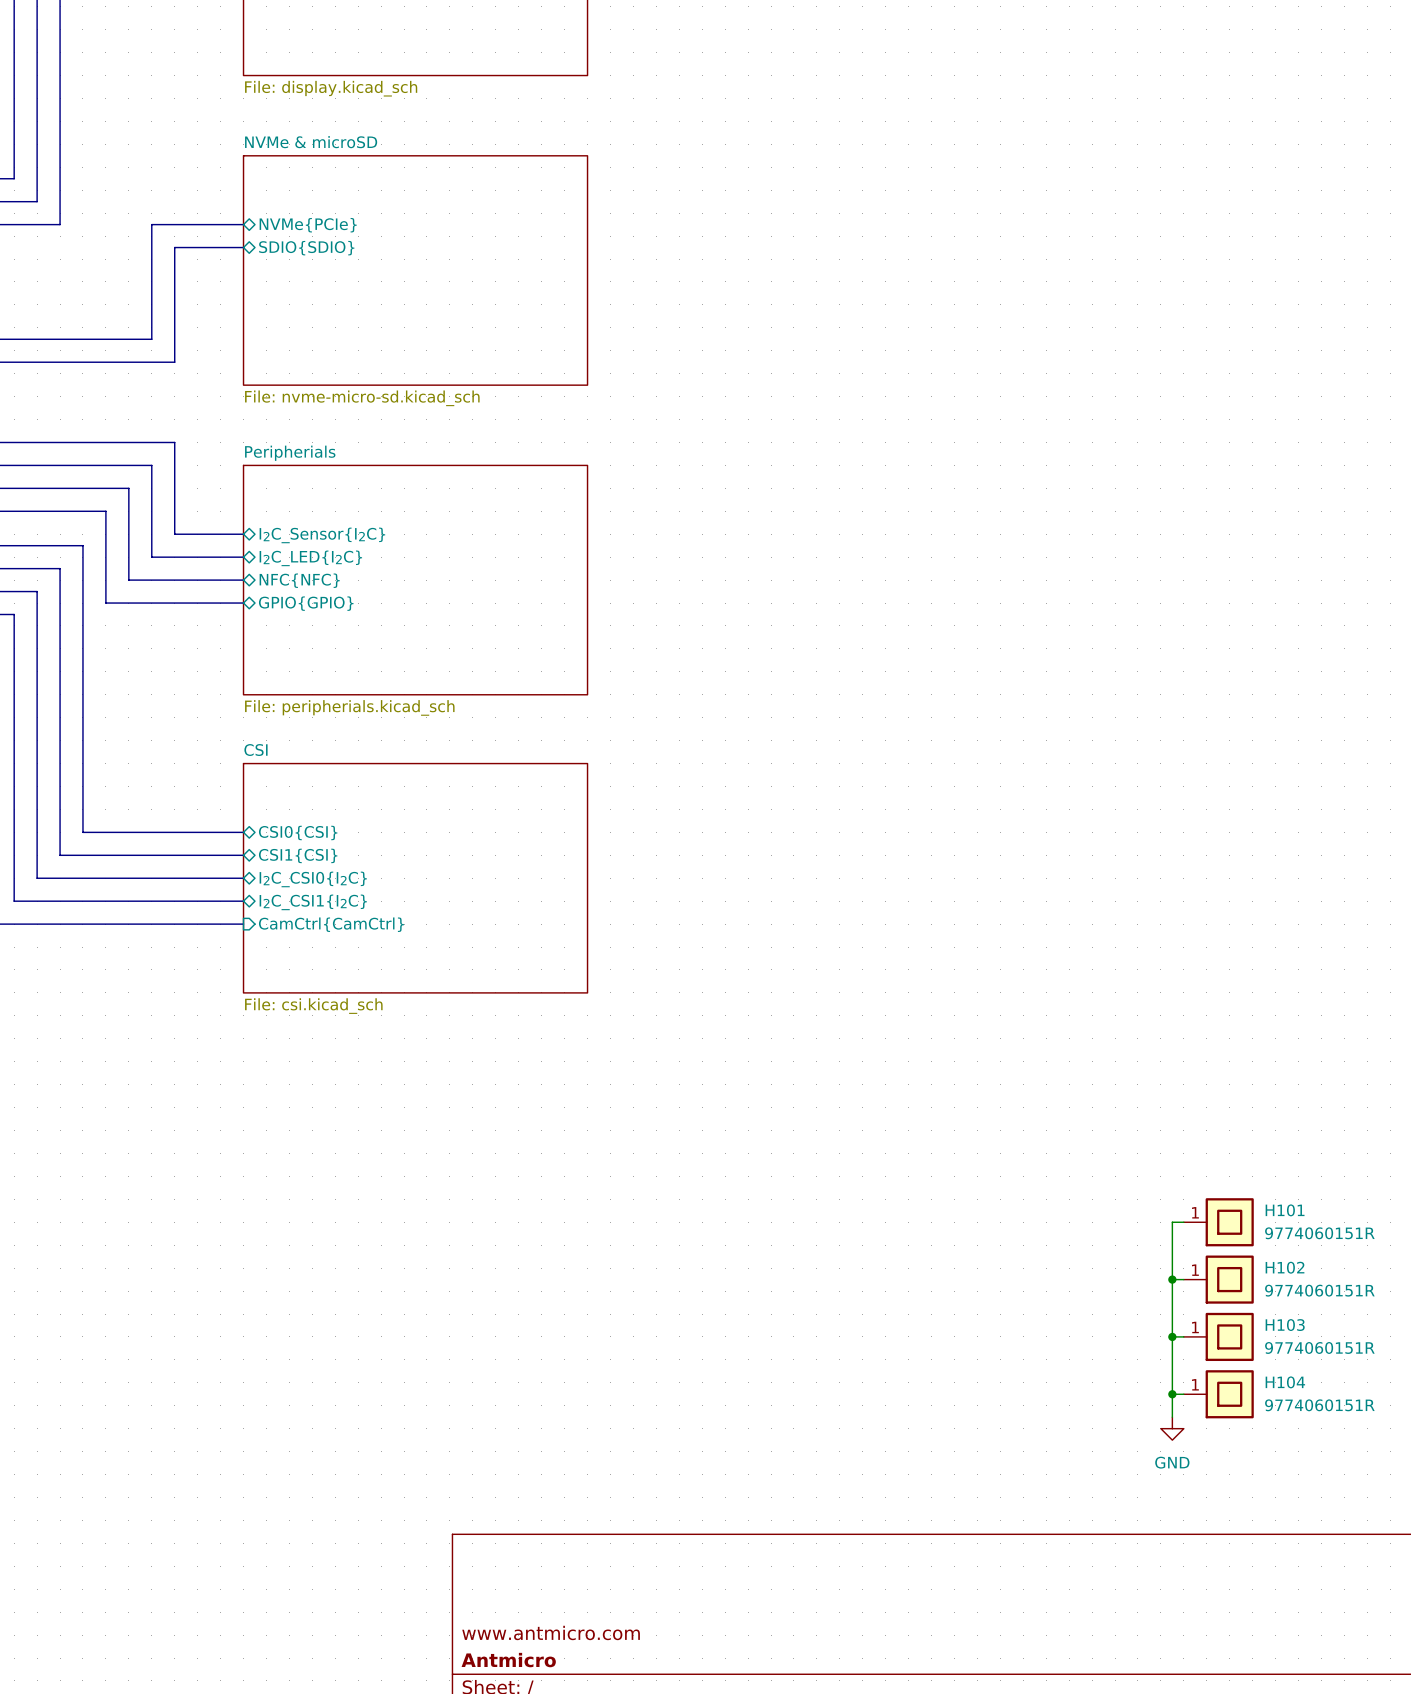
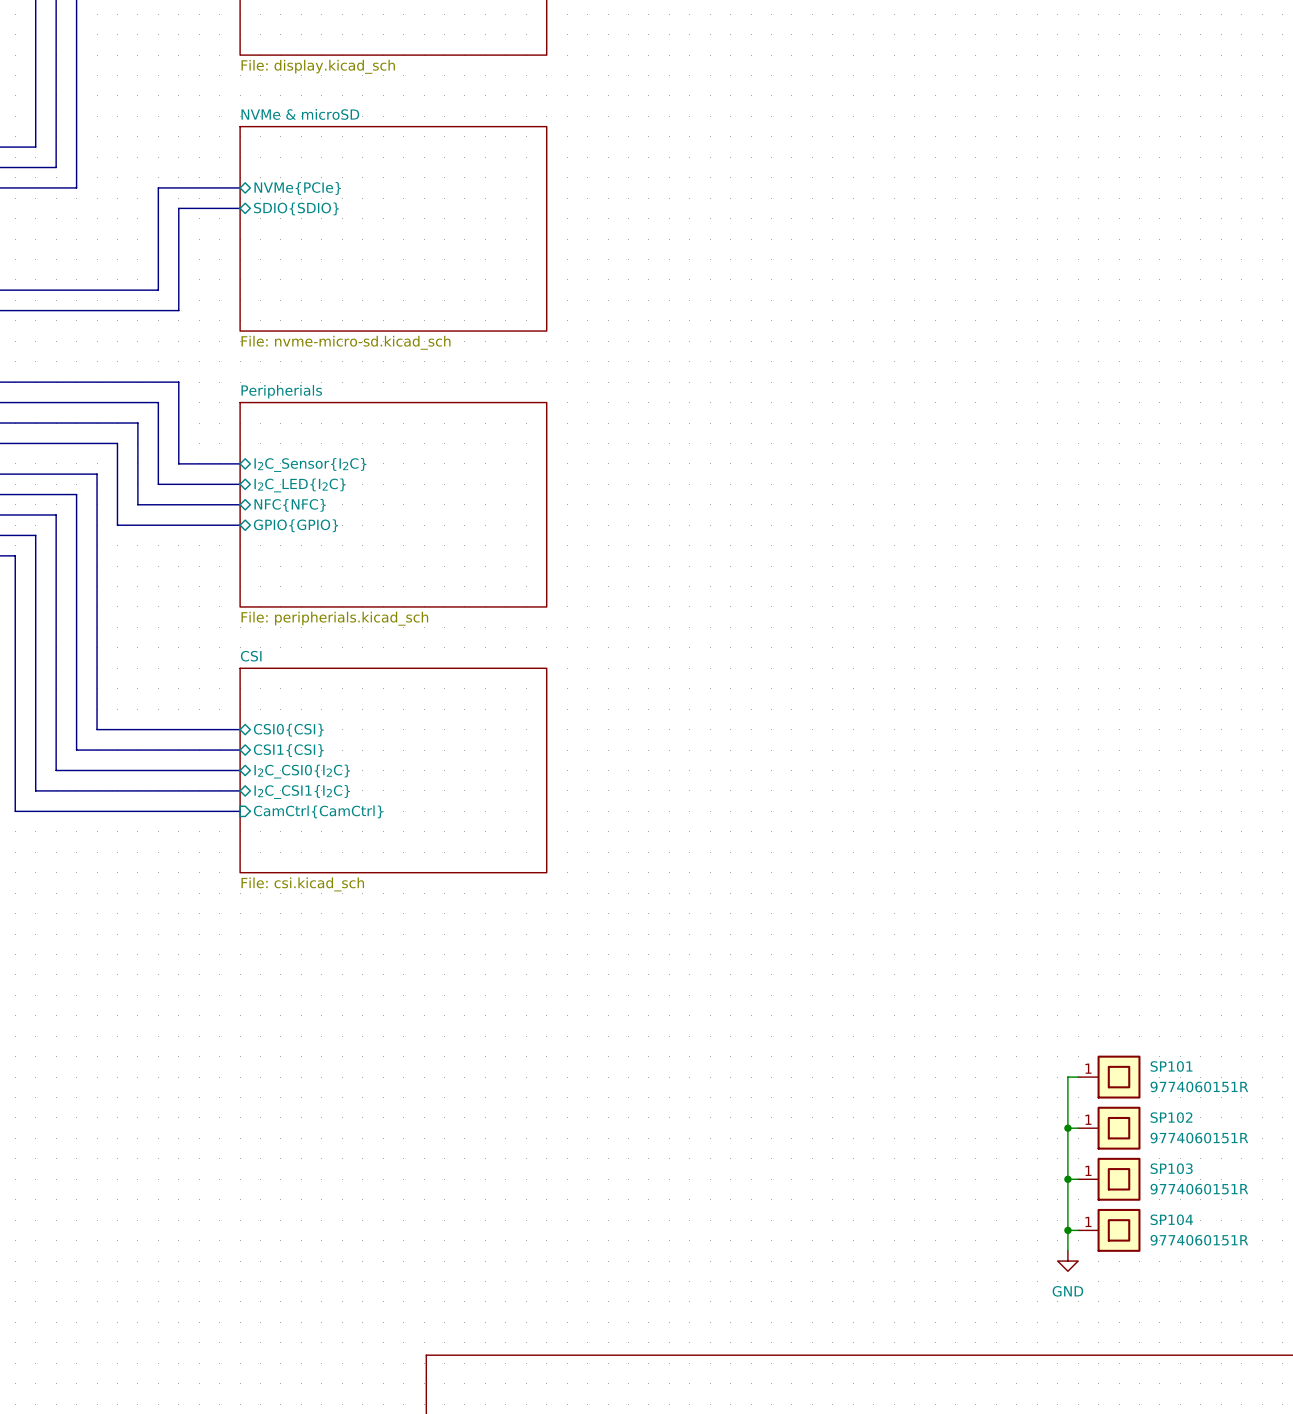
H101 name: H101 (1285, 1210) -> SP101 (1171, 1066)
H102 name: H102 (1285, 1267) -> SP102 (1171, 1117)
H103 name: H103 (1285, 1325) -> SP103 (1171, 1168)
H104 name: H104 (1285, 1382) -> SP104 (1171, 1219)

